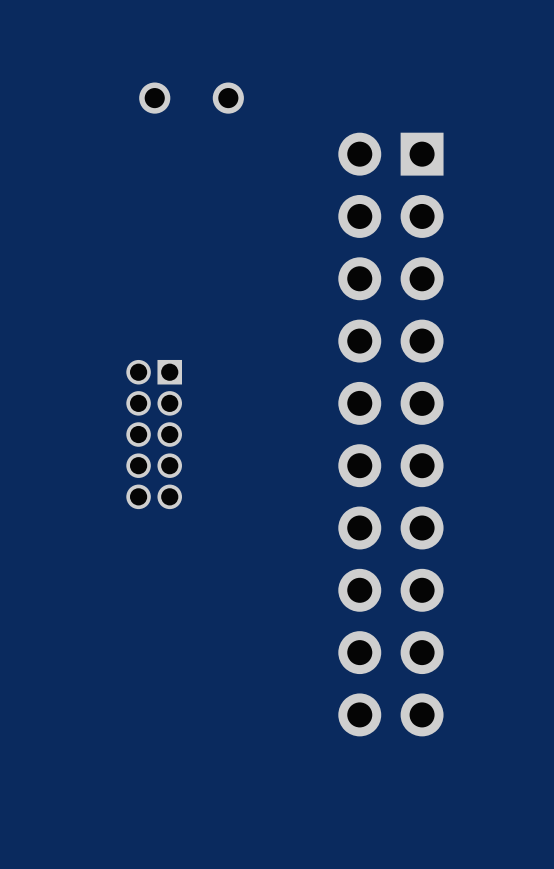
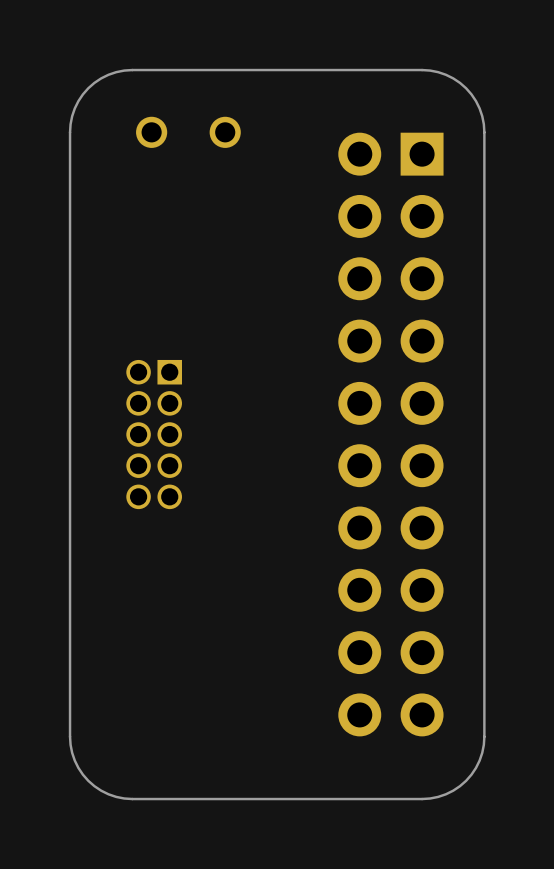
part position: (191, 98) -> (188, 132)
board edge: none -> (484, 736) (479, 760) (471, 774) (453, 790) (430, 798) (124, 798) (101, 790) (88, 780) (78, 767) (72, 752) (70, 736) (70, 132) (72, 116) (78, 101) (88, 88) (101, 78) (116, 72) (132, 70) (422, 70) (438, 72) (453, 78) (466, 88) (476, 101) (482, 116) (484, 132) (484, 736)

